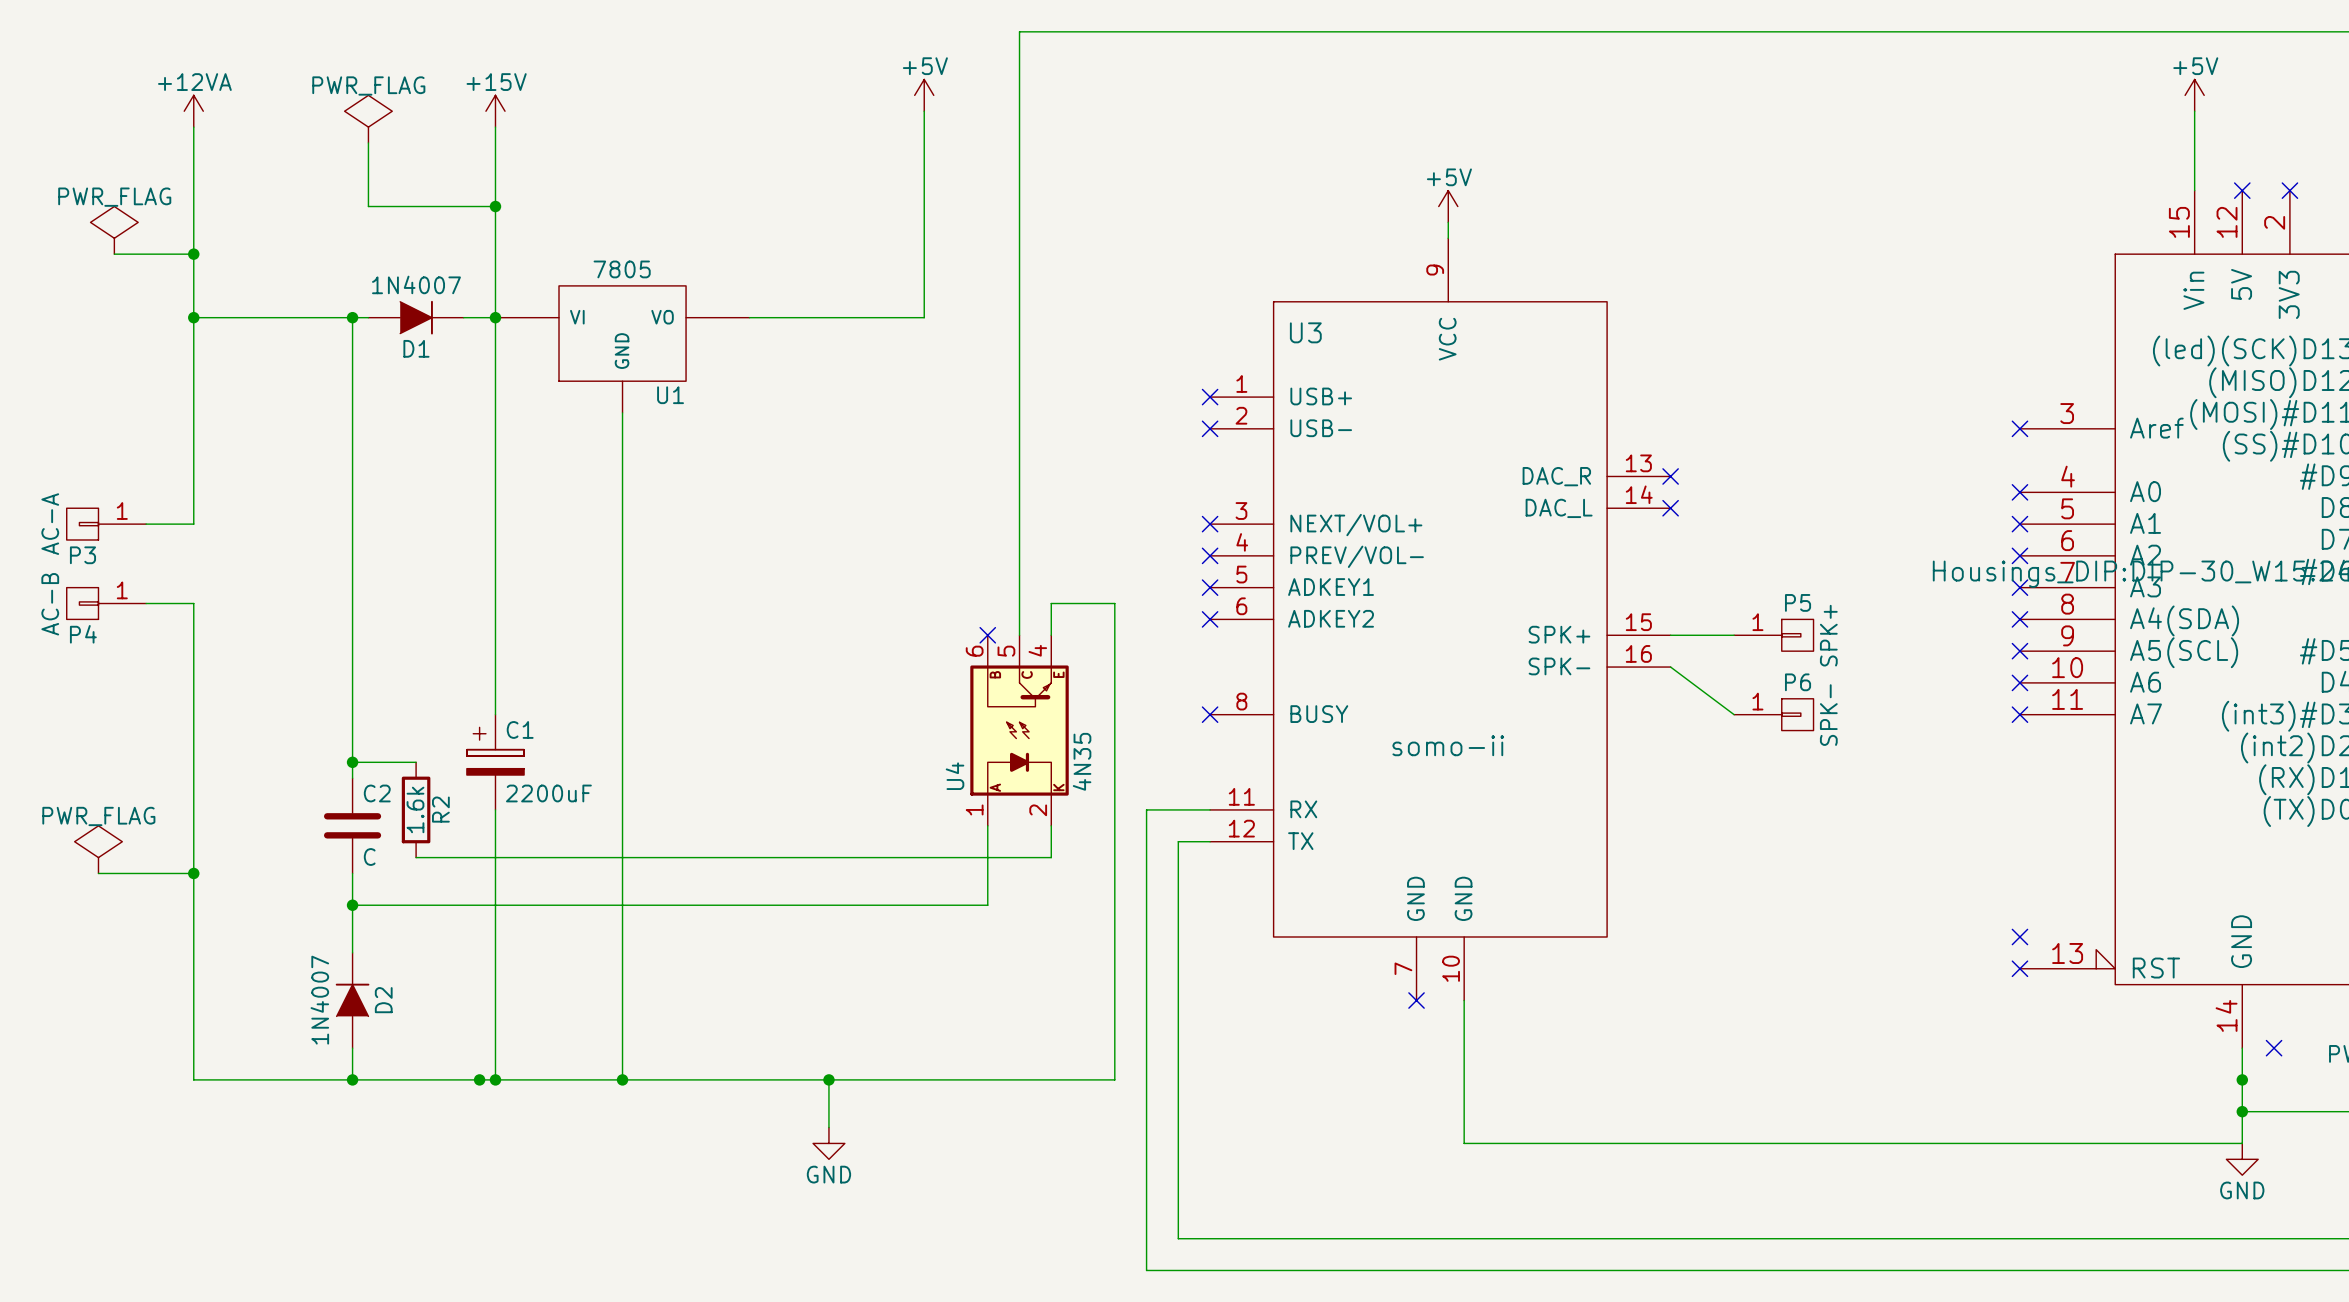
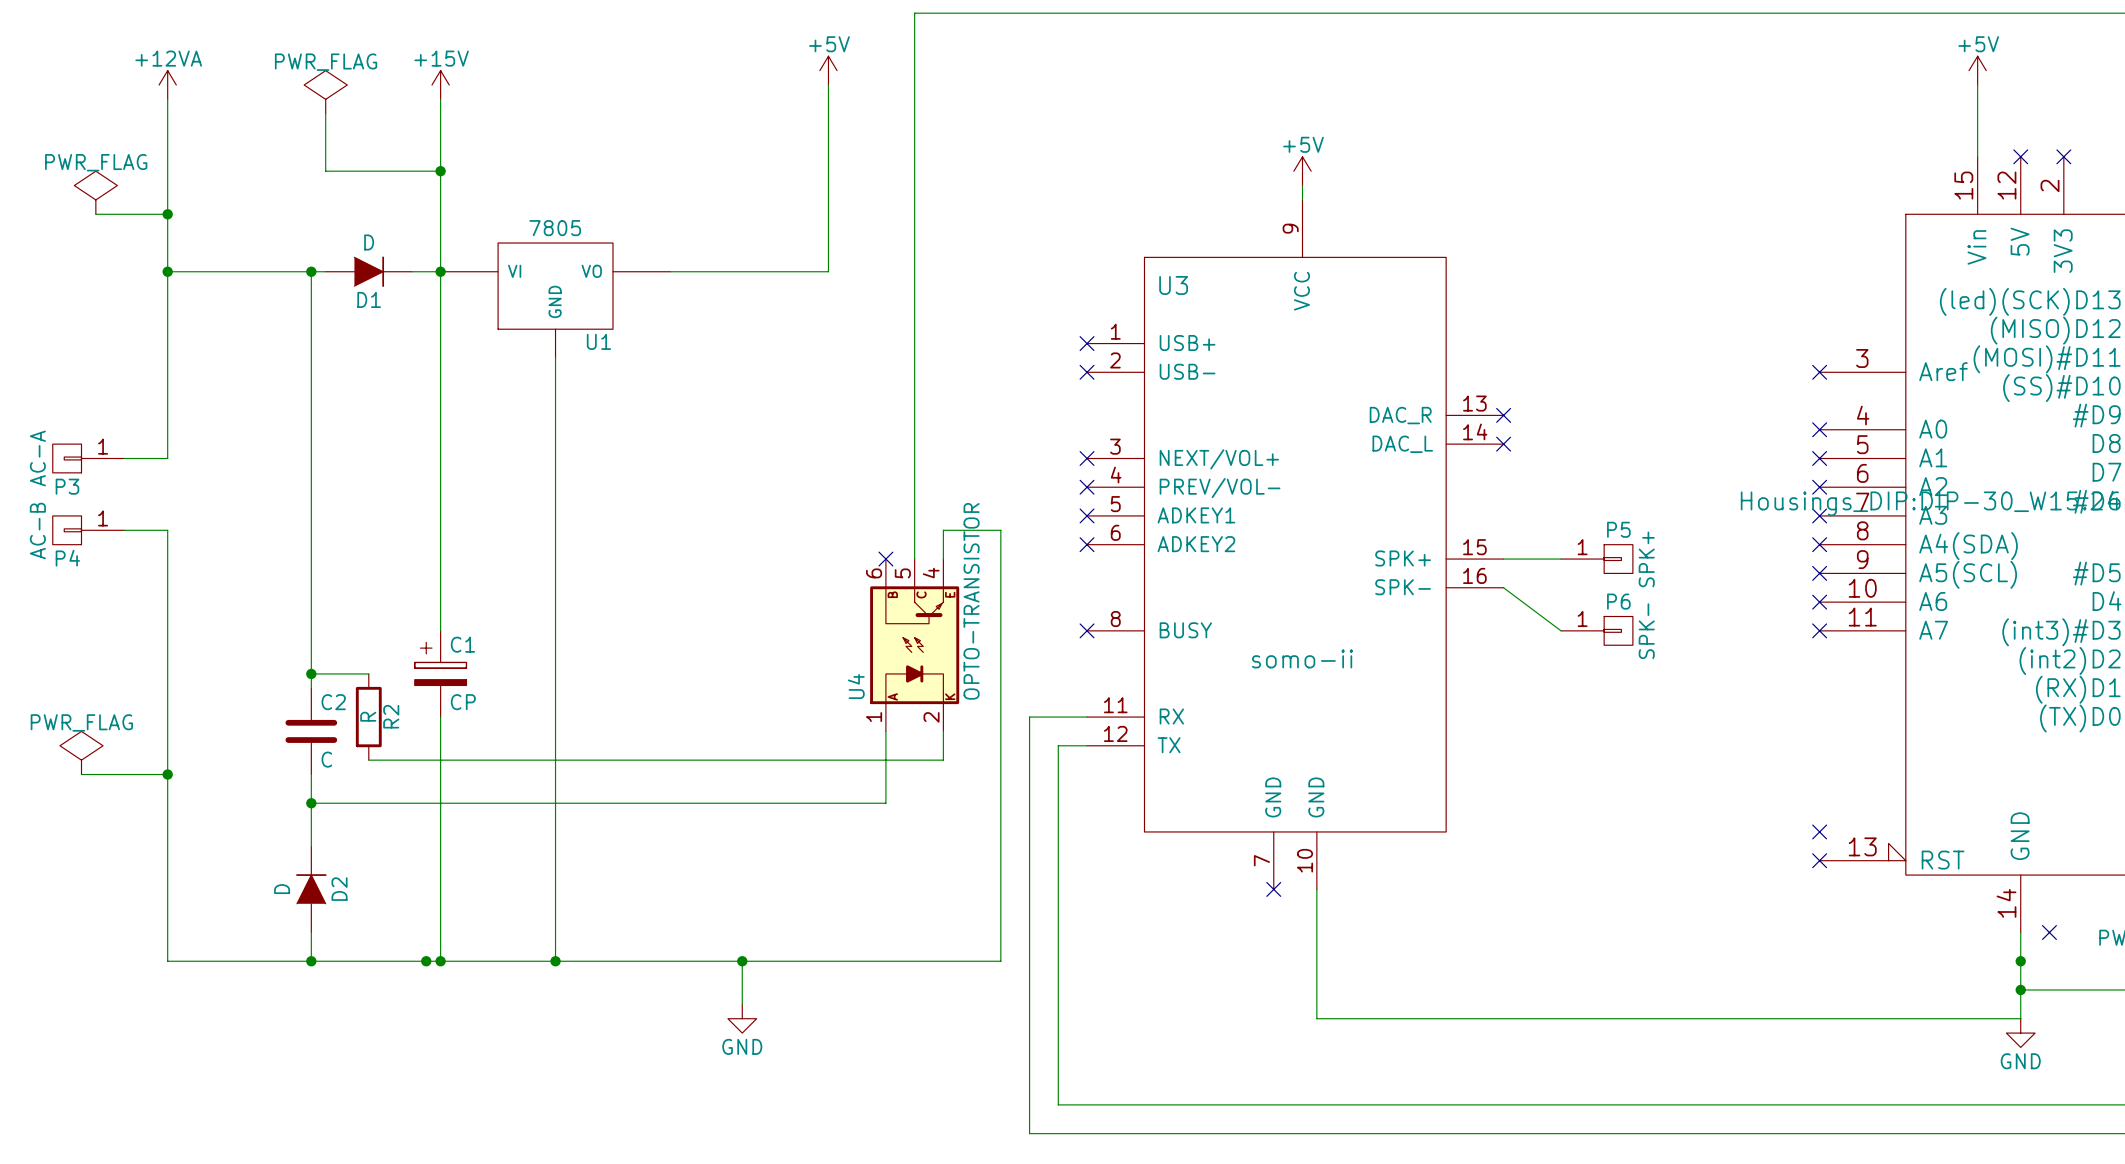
D1 value: 1N4007 (416, 284) -> D (369, 242)
U4 value: 4N35 (1082, 761) -> OPTO-TRANSISTOR (971, 601)
C1 value: 2200uF (548, 793) -> CP (463, 702)
R2 value: 1.6k (415, 809) -> R (368, 716)
D2 value: 1N4007 (319, 1000) -> D (282, 889)

